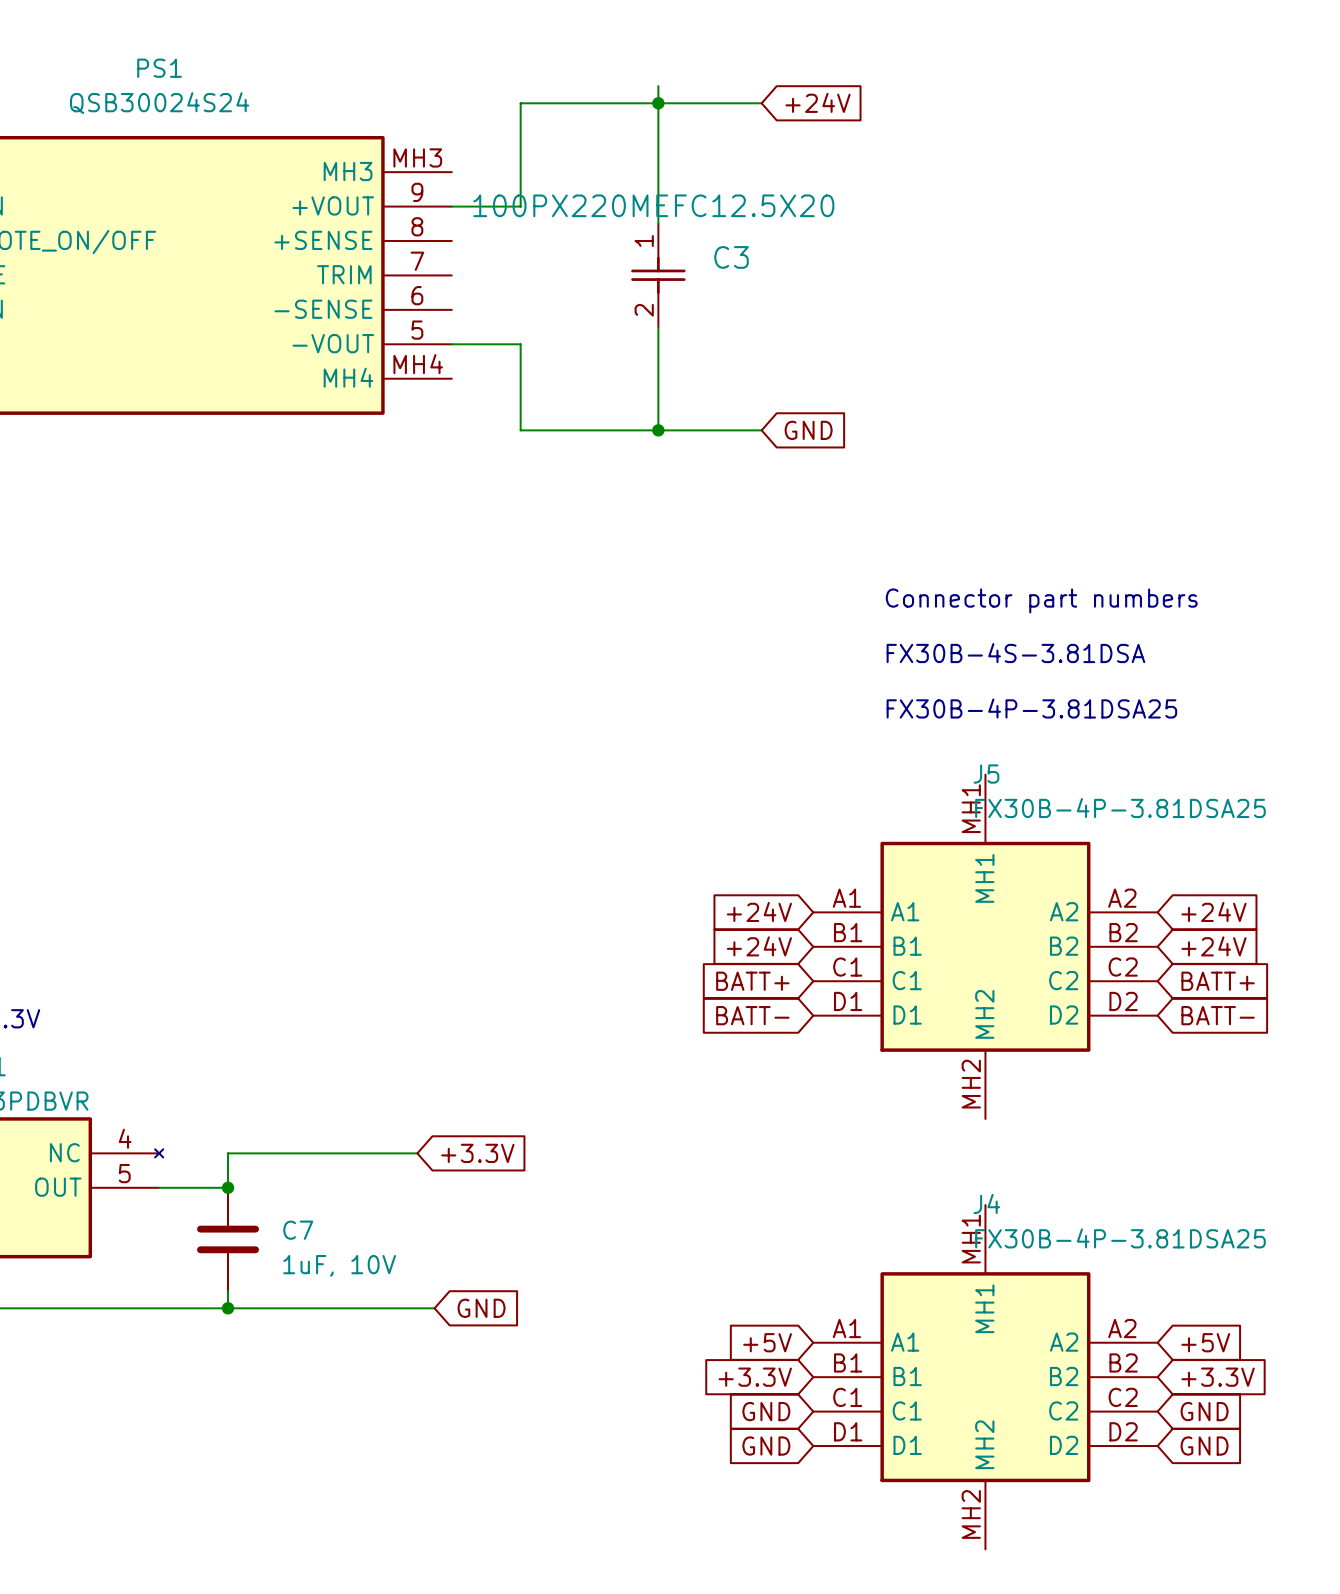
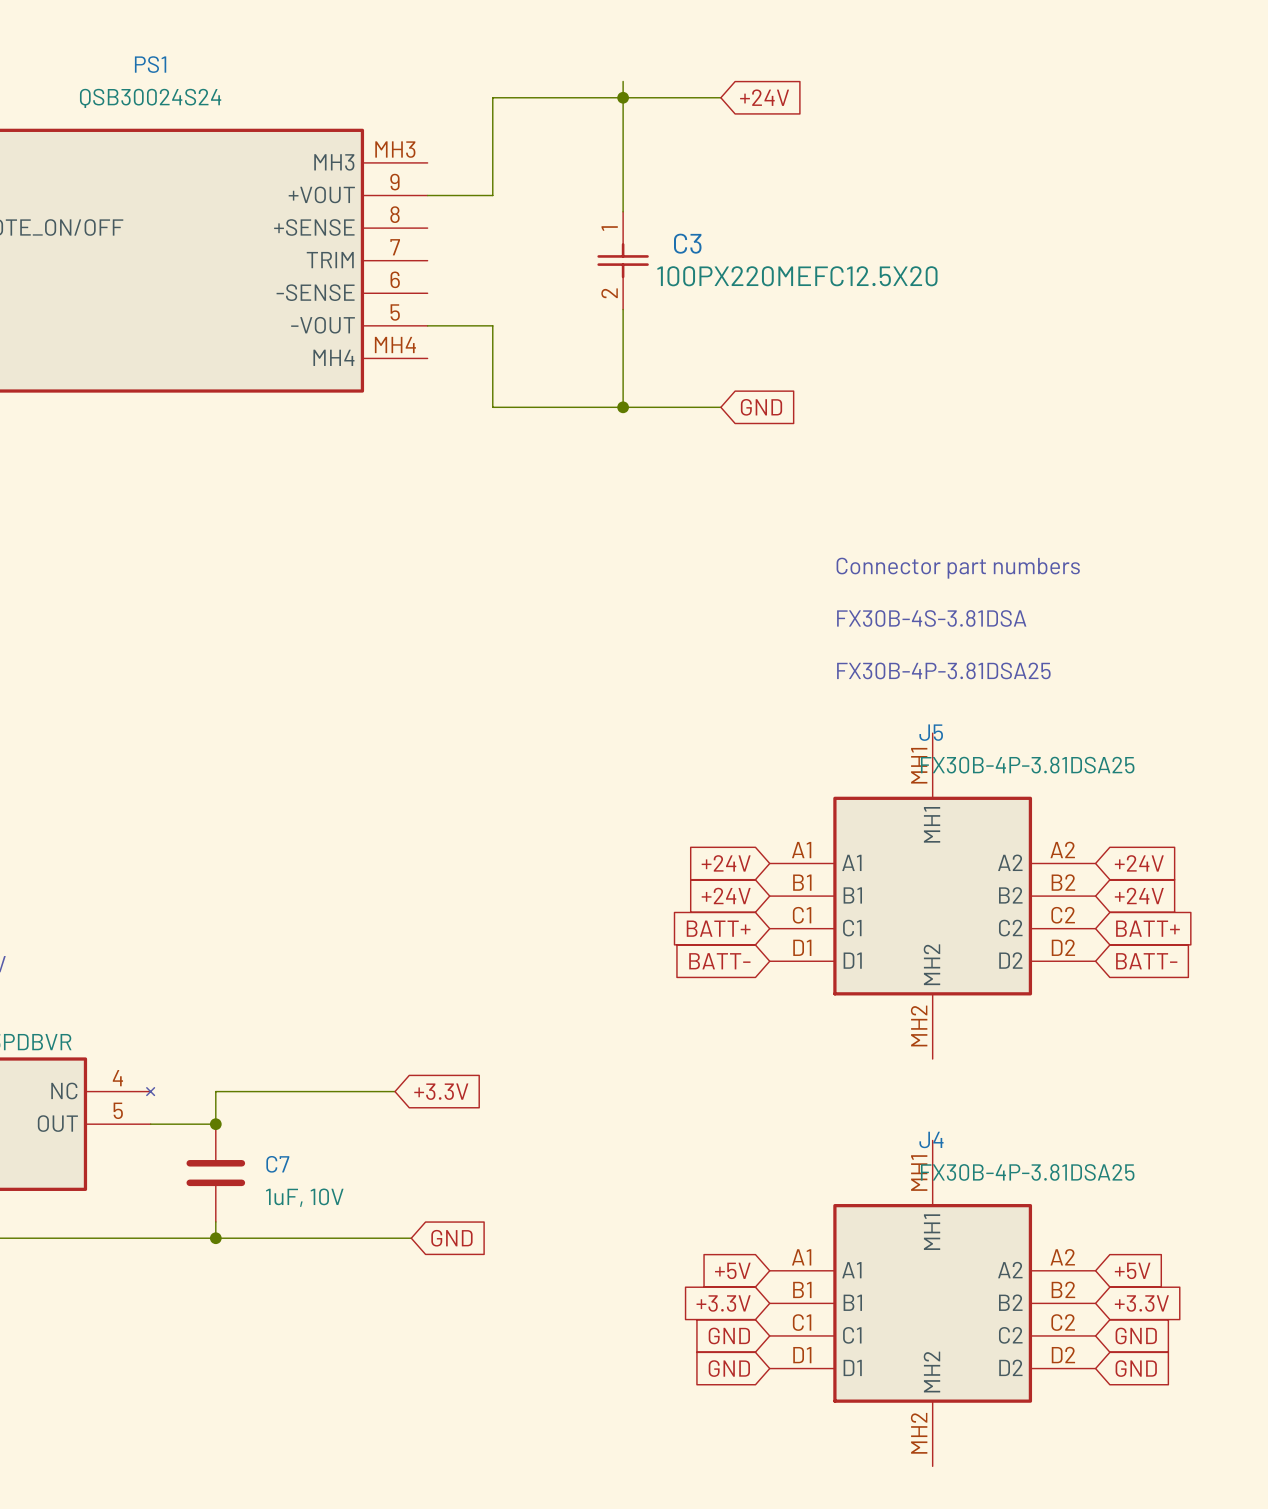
C3 value position: 100PX220MEFC12.5X20 (653, 205) -> 100PX220MEFC12.5X20 (797, 276)

